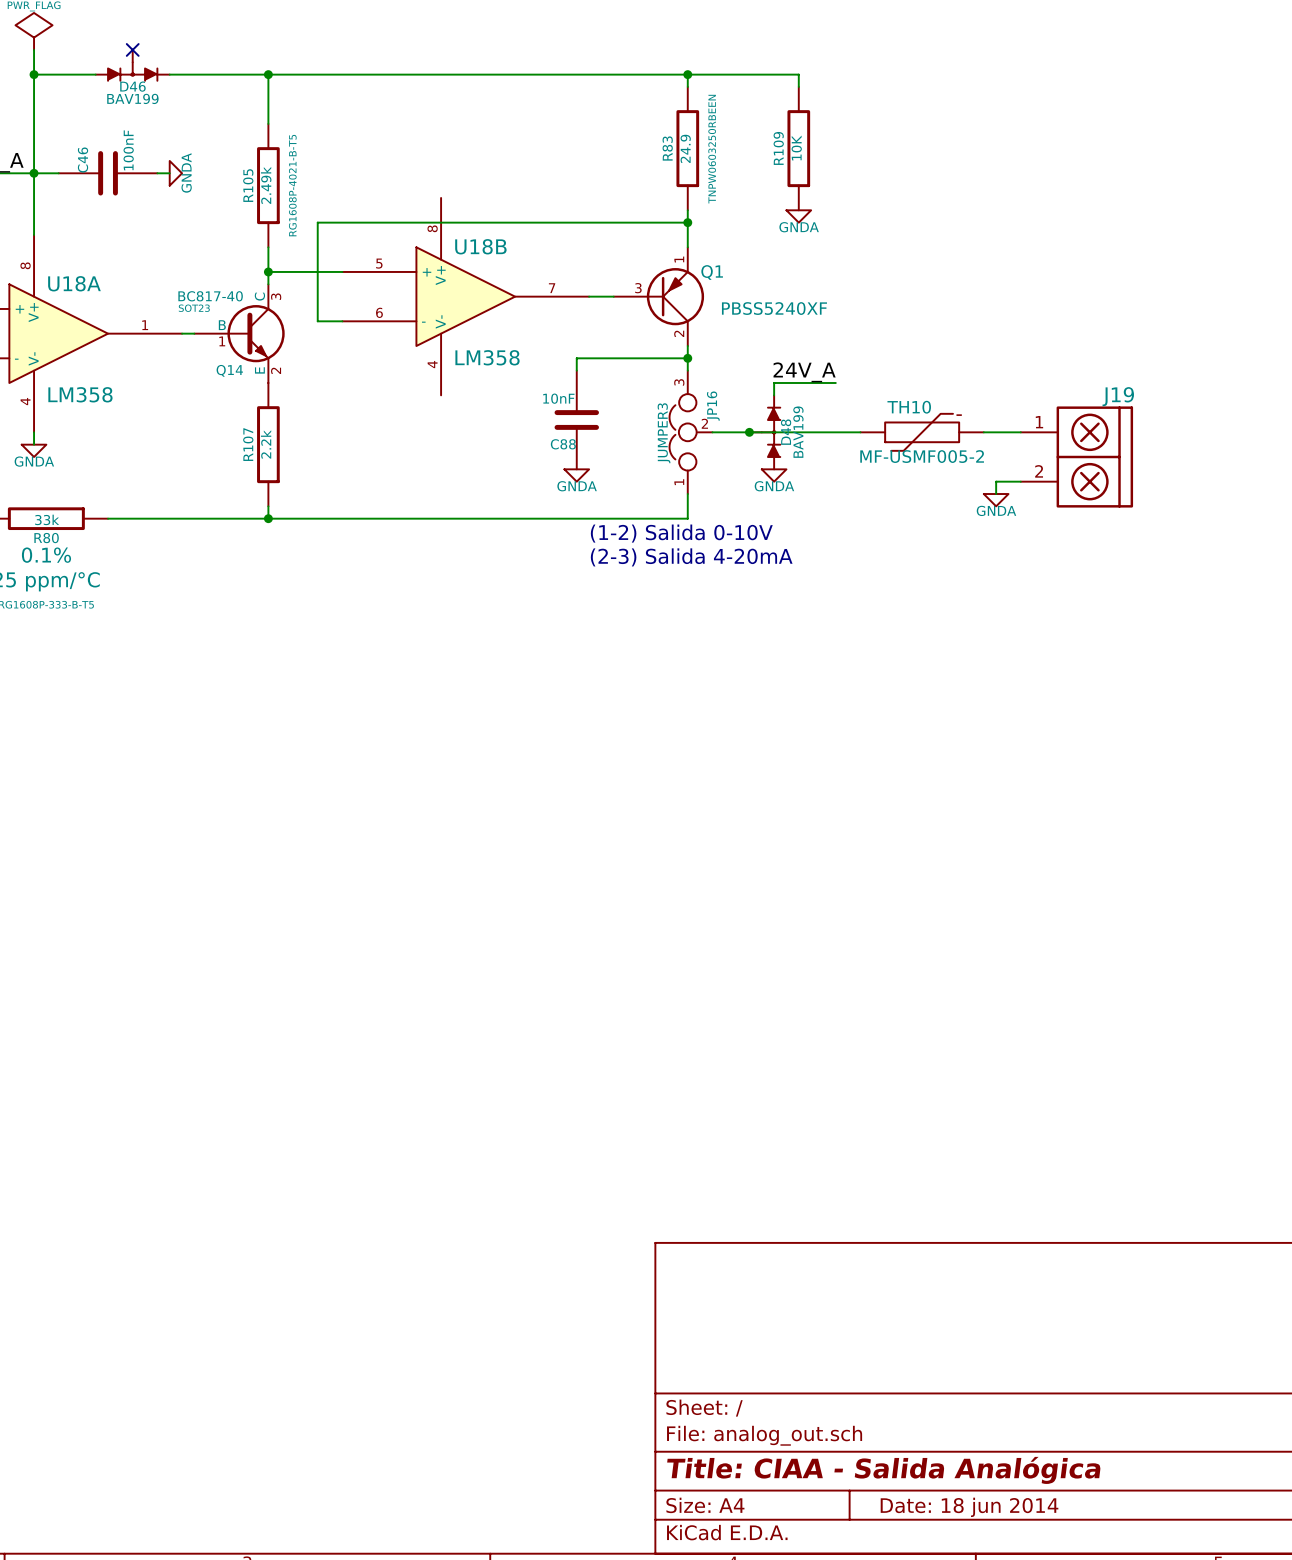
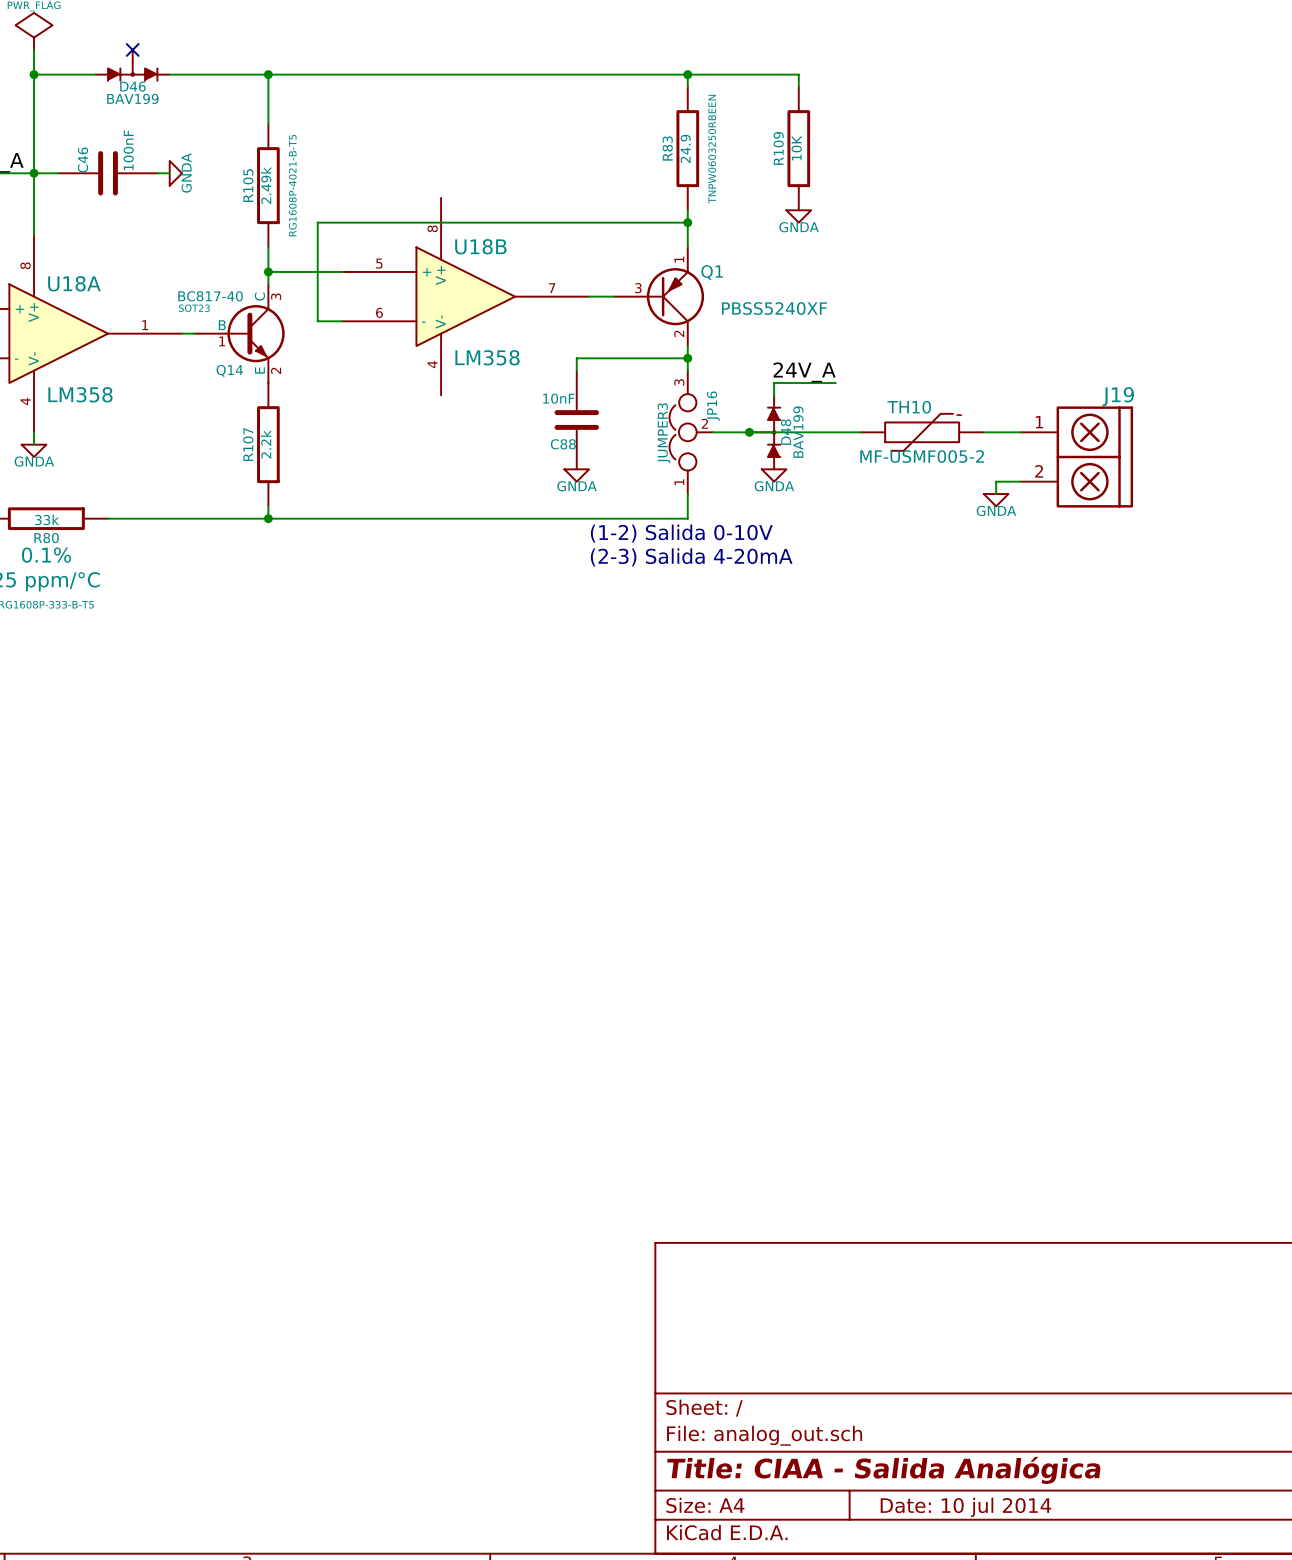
title block: Date: 18 jun 2014 (969, 1507) -> Date: 10 jul 2014 (965, 1507)

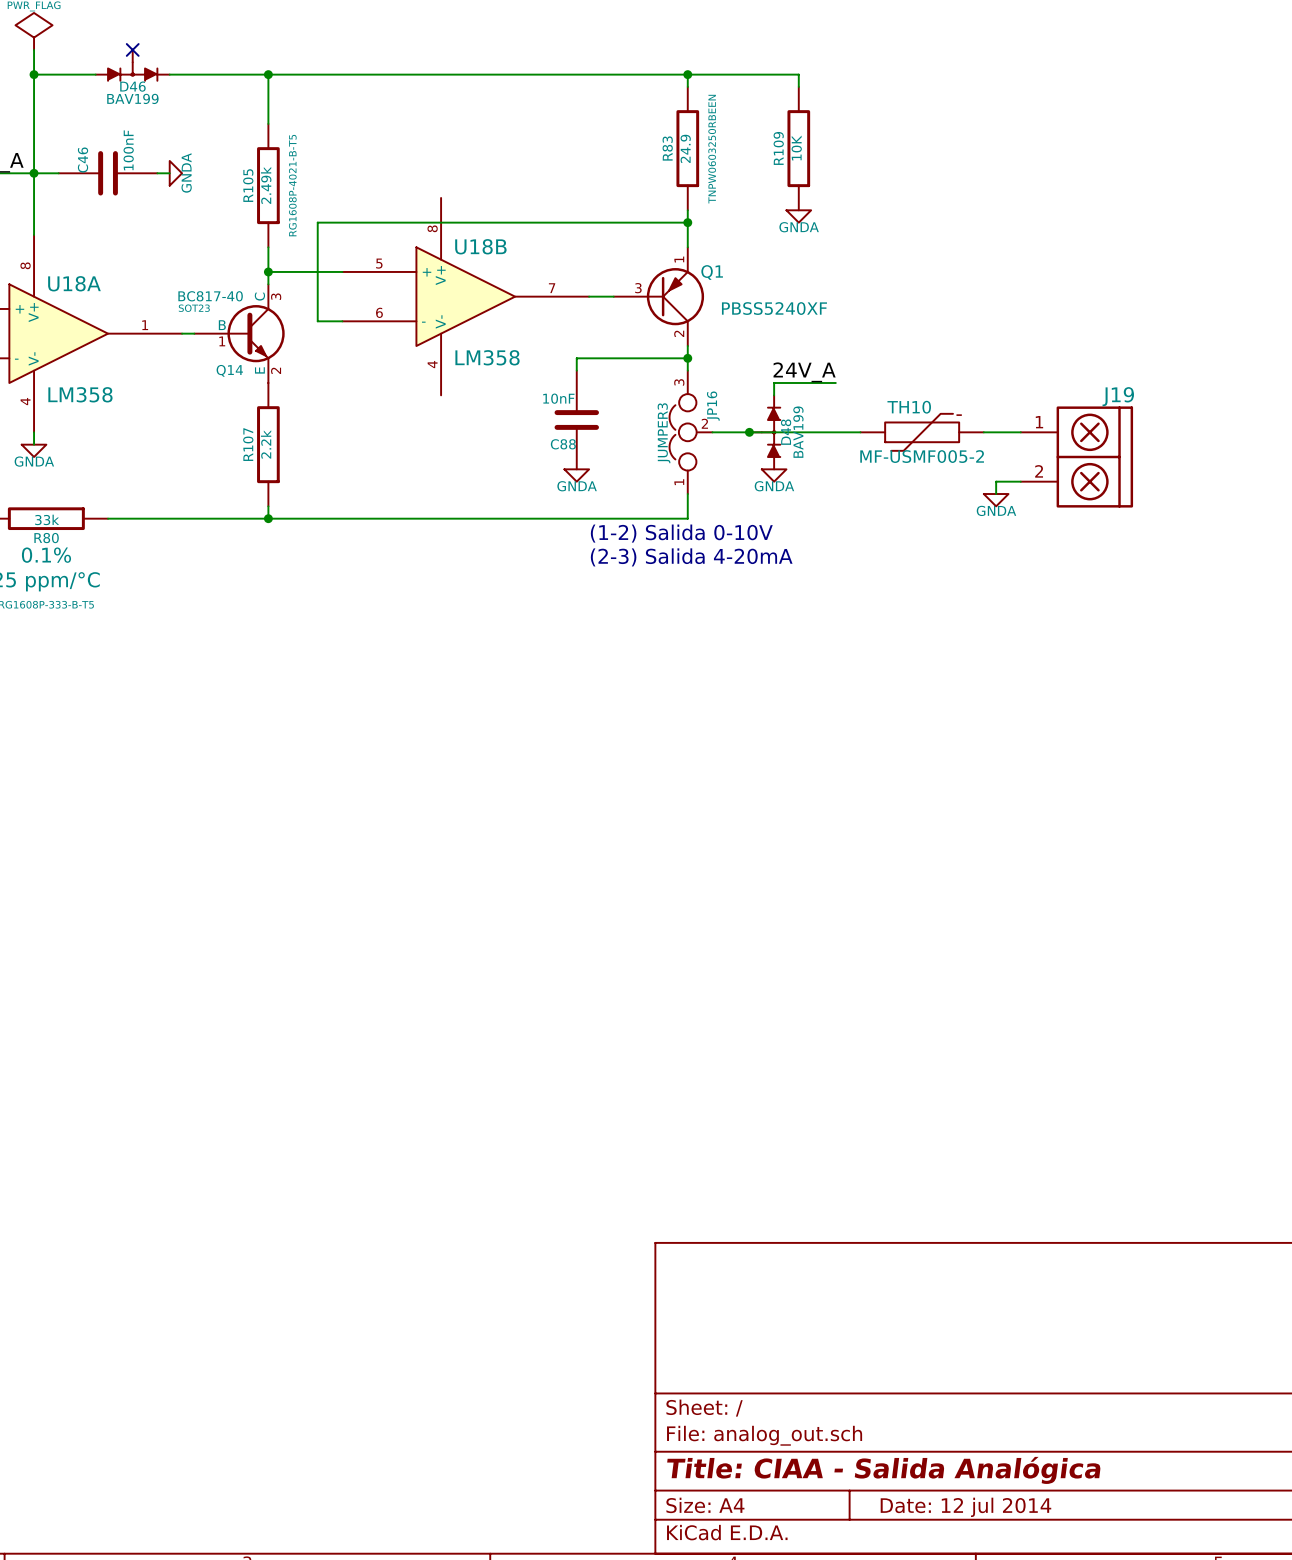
title block: Date: 10 jul 2014 (965, 1507) -> Date: 12 jul 2014 (965, 1507)

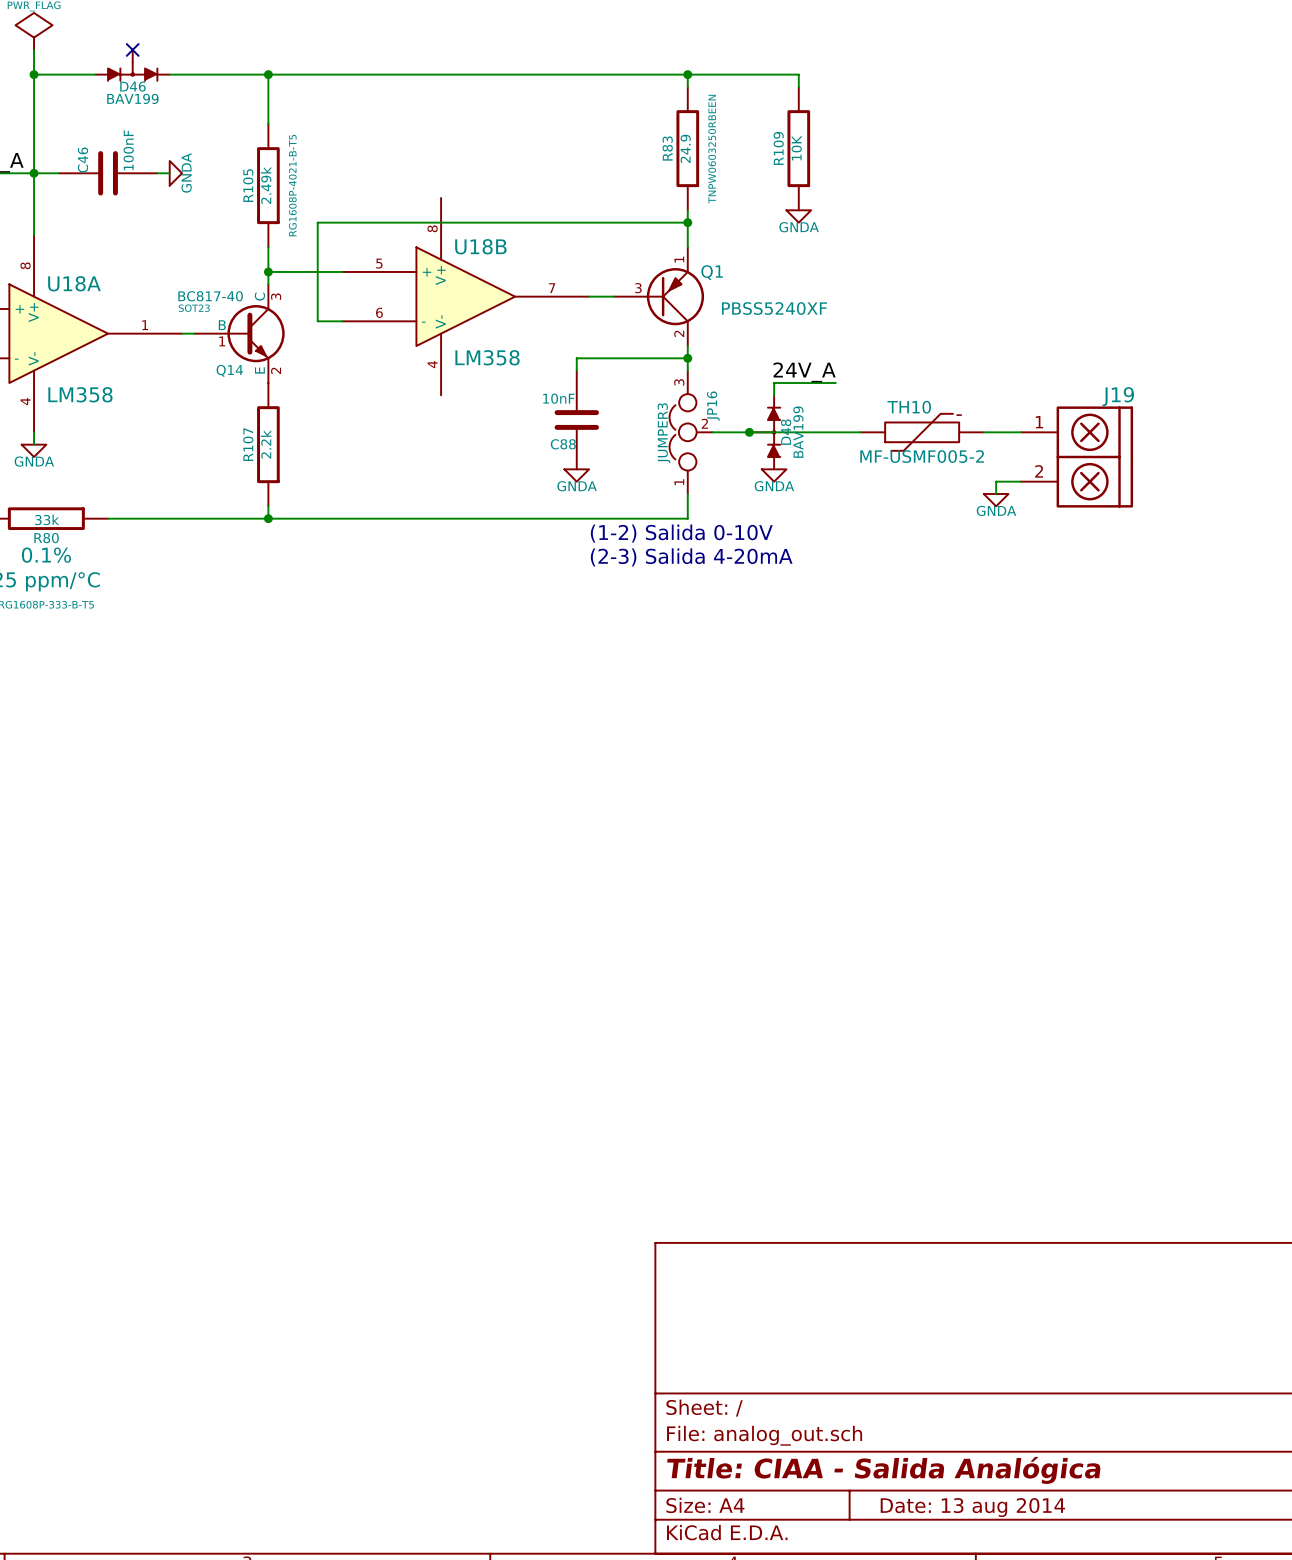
title block: Date: 12 jul 2014 (965, 1507) -> Date: 13 aug 2014 (972, 1507)

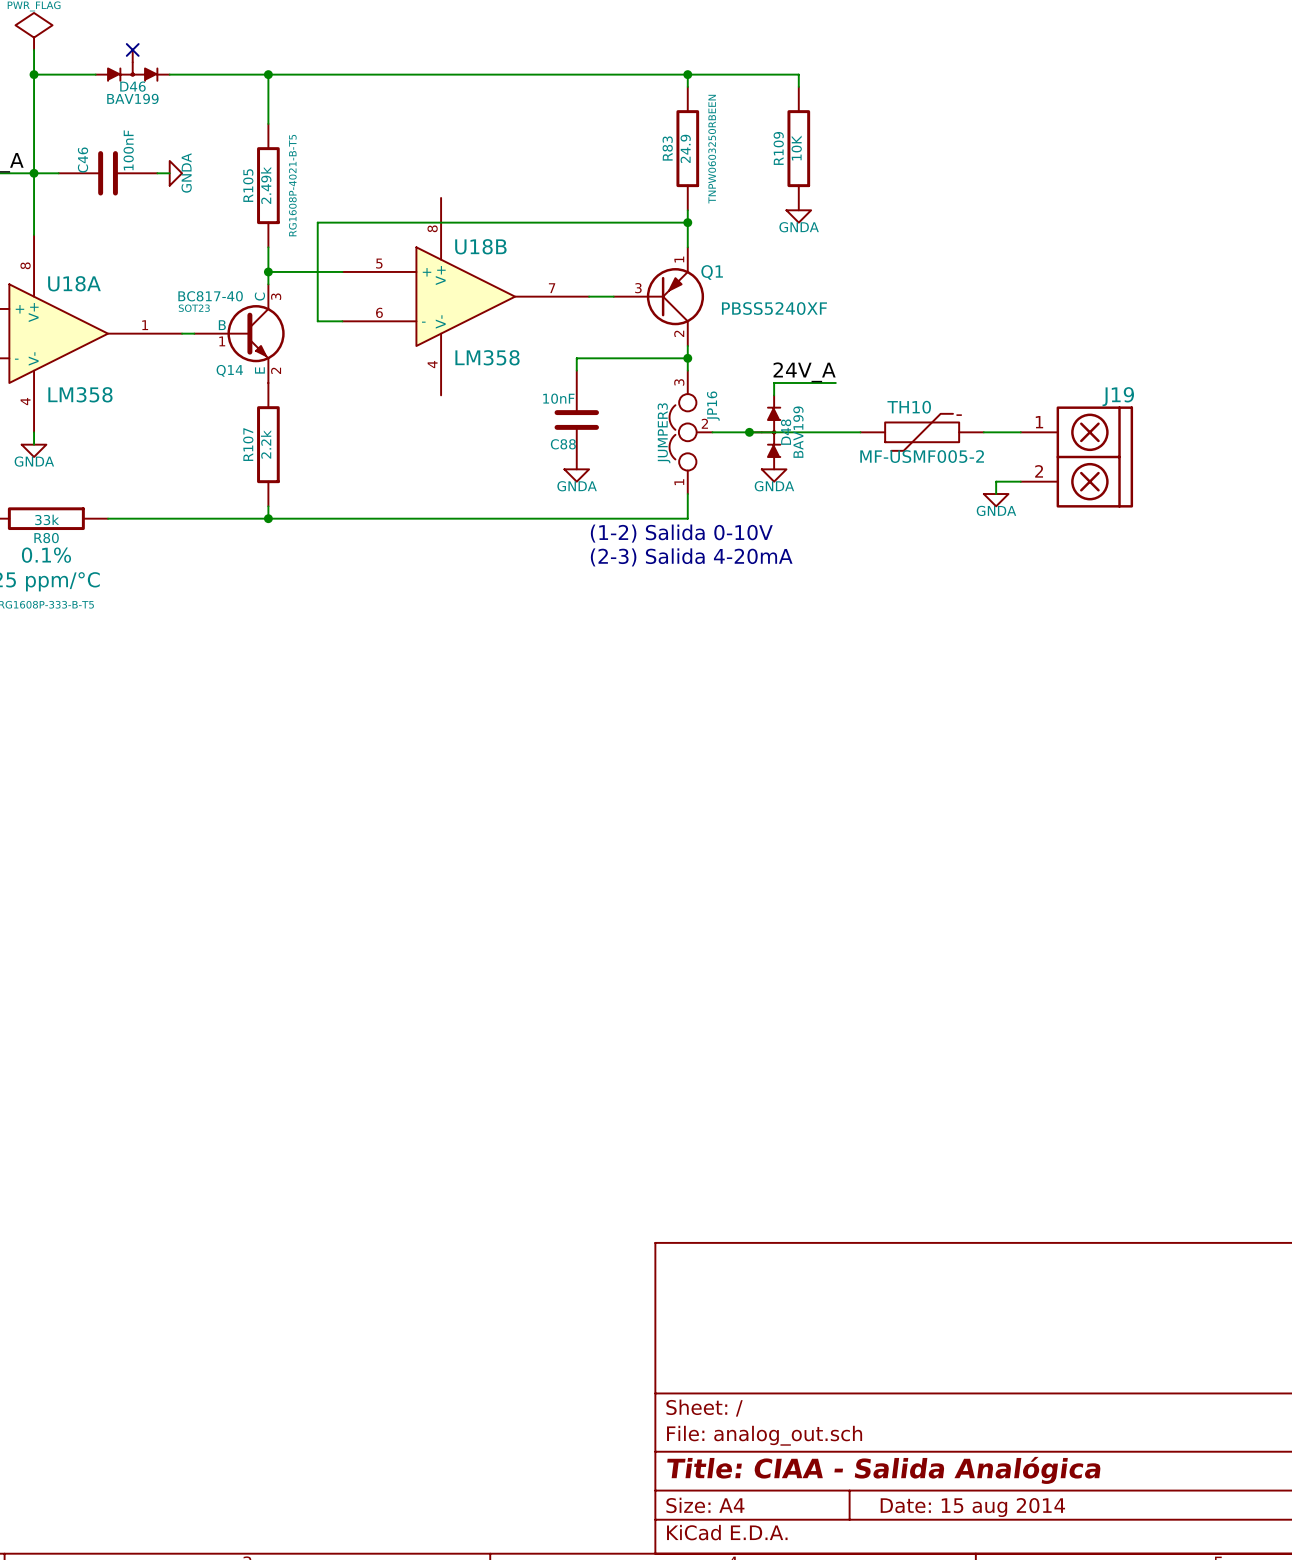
title block: Date: 13 aug 2014 (972, 1507) -> Date: 15 aug 2014 (972, 1507)

